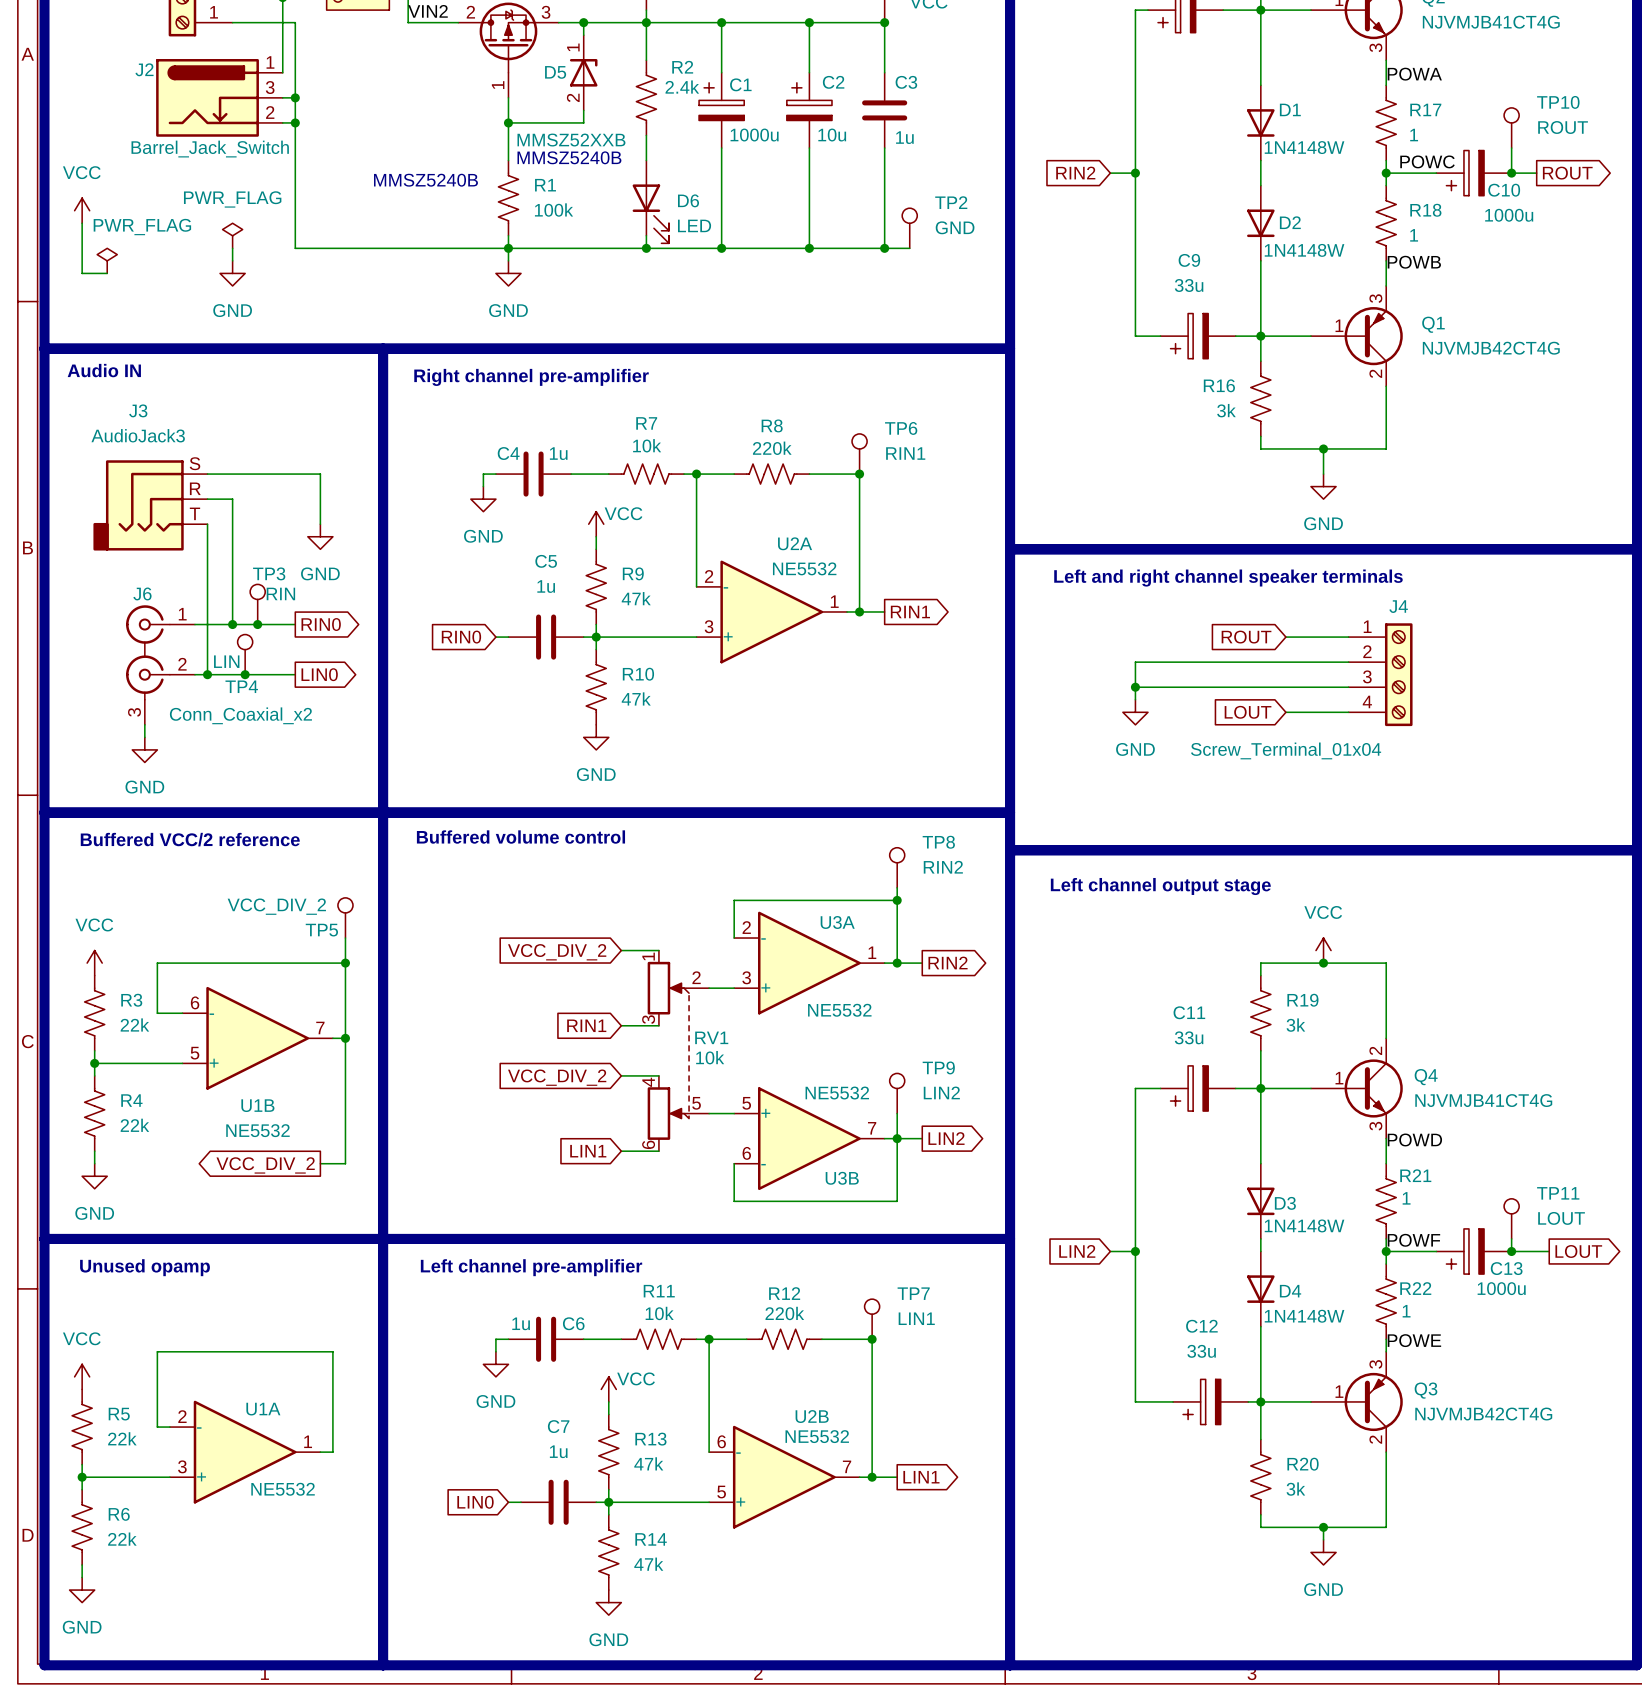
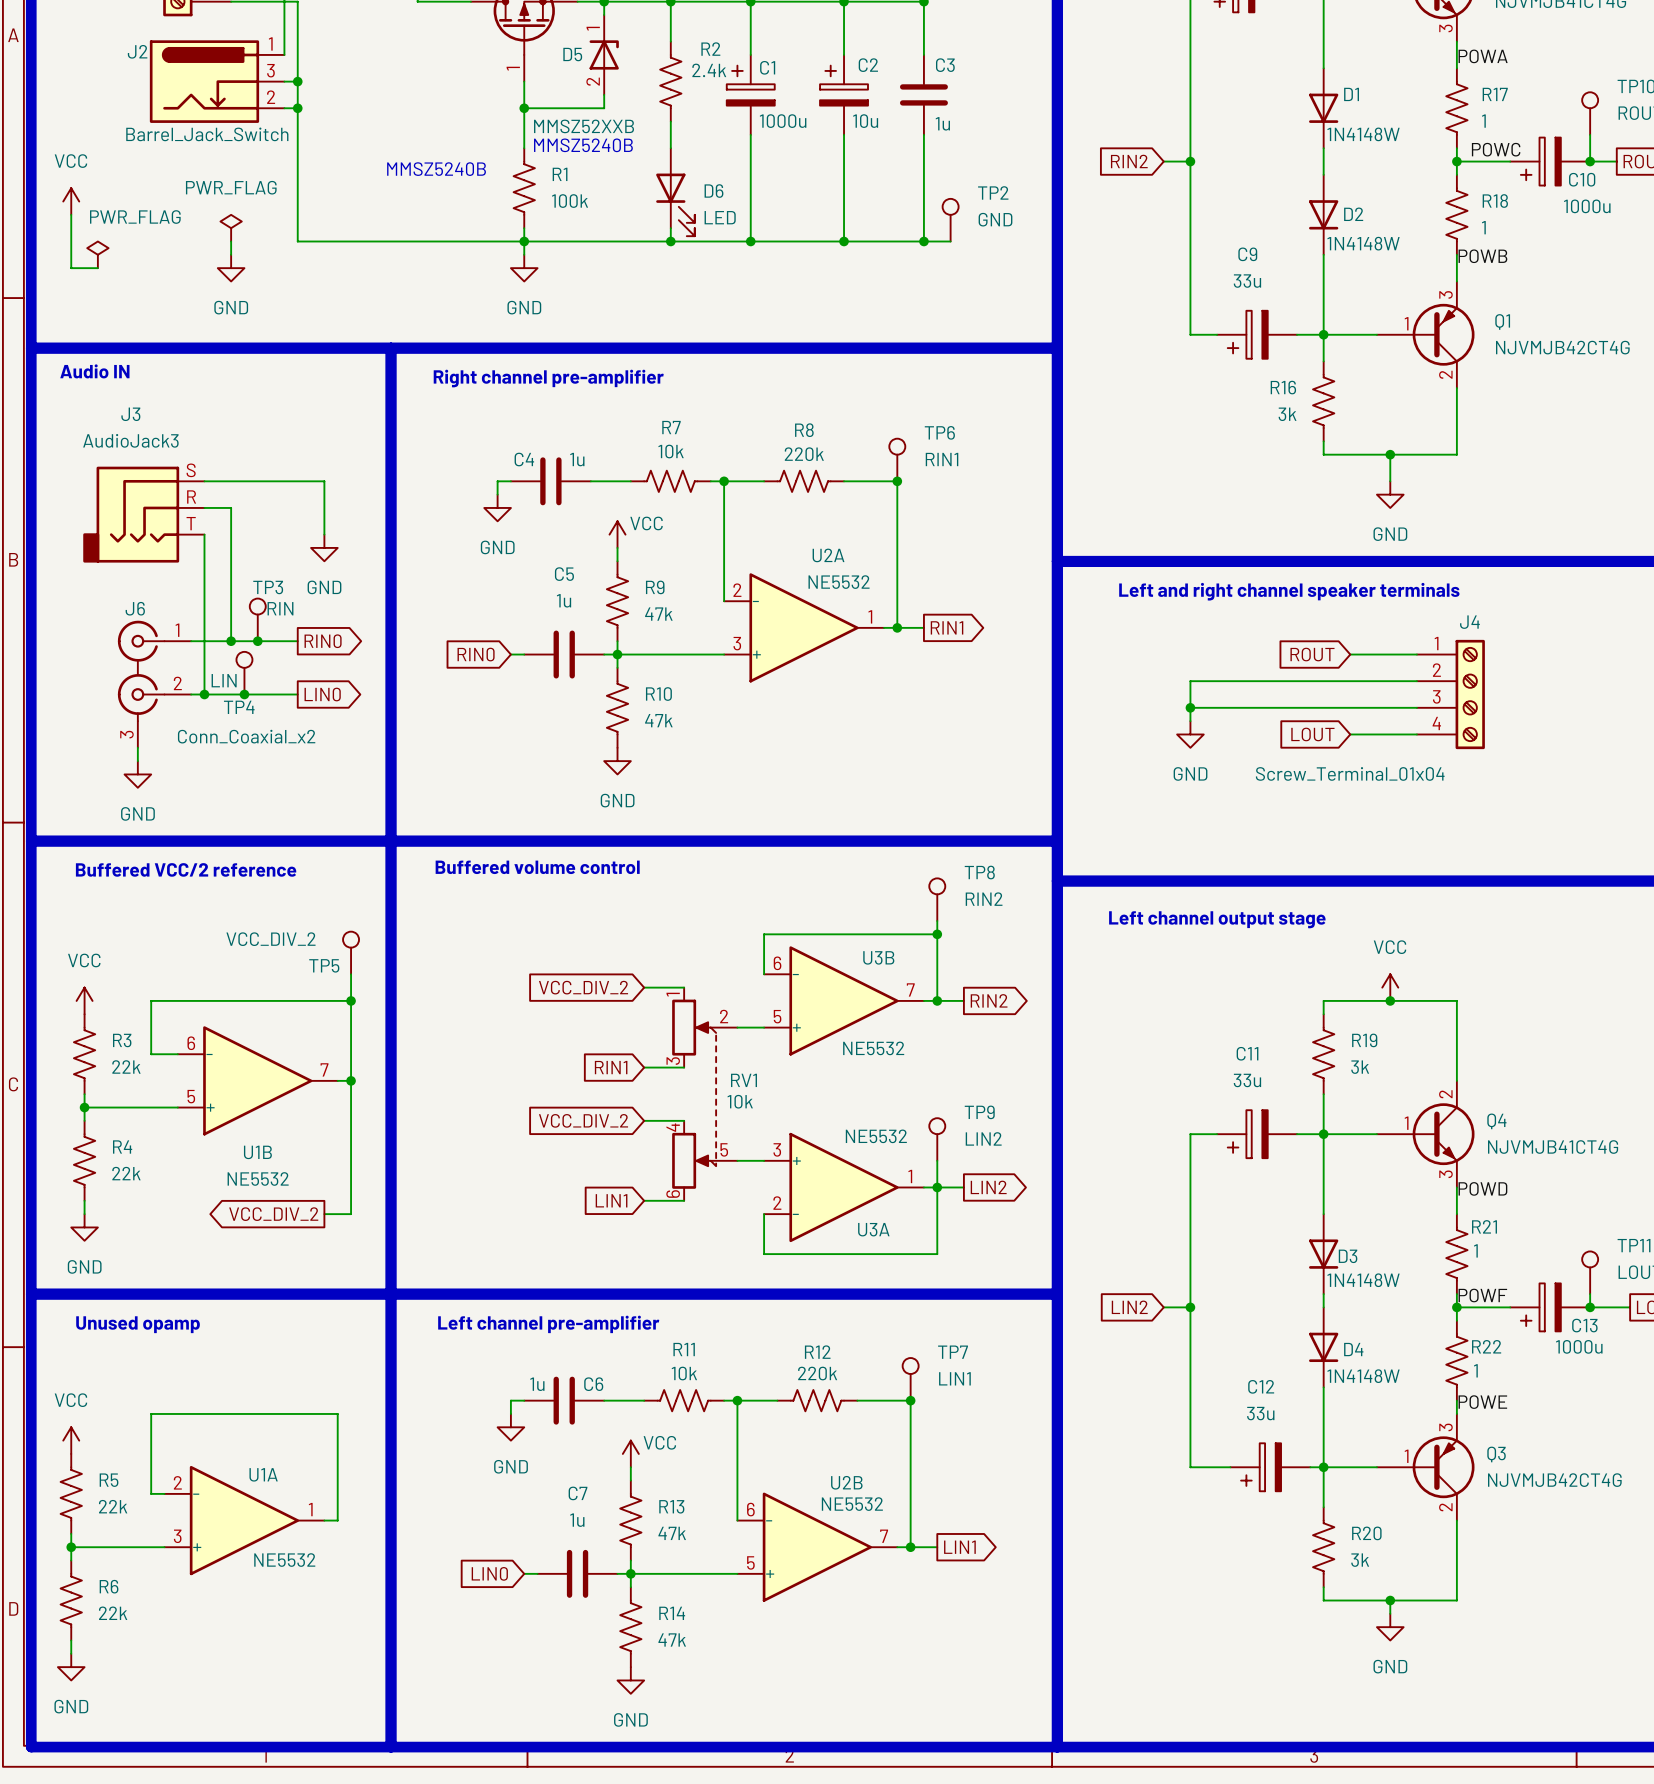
U3A flip: as is (809, 963) -> up-down (844, 1187)
U3A position: (809, 963) -> (844, 1187)
U3B flip: as is (809, 1138) -> up-down (844, 1000)
U3B position: (809, 1138) -> (844, 1000)

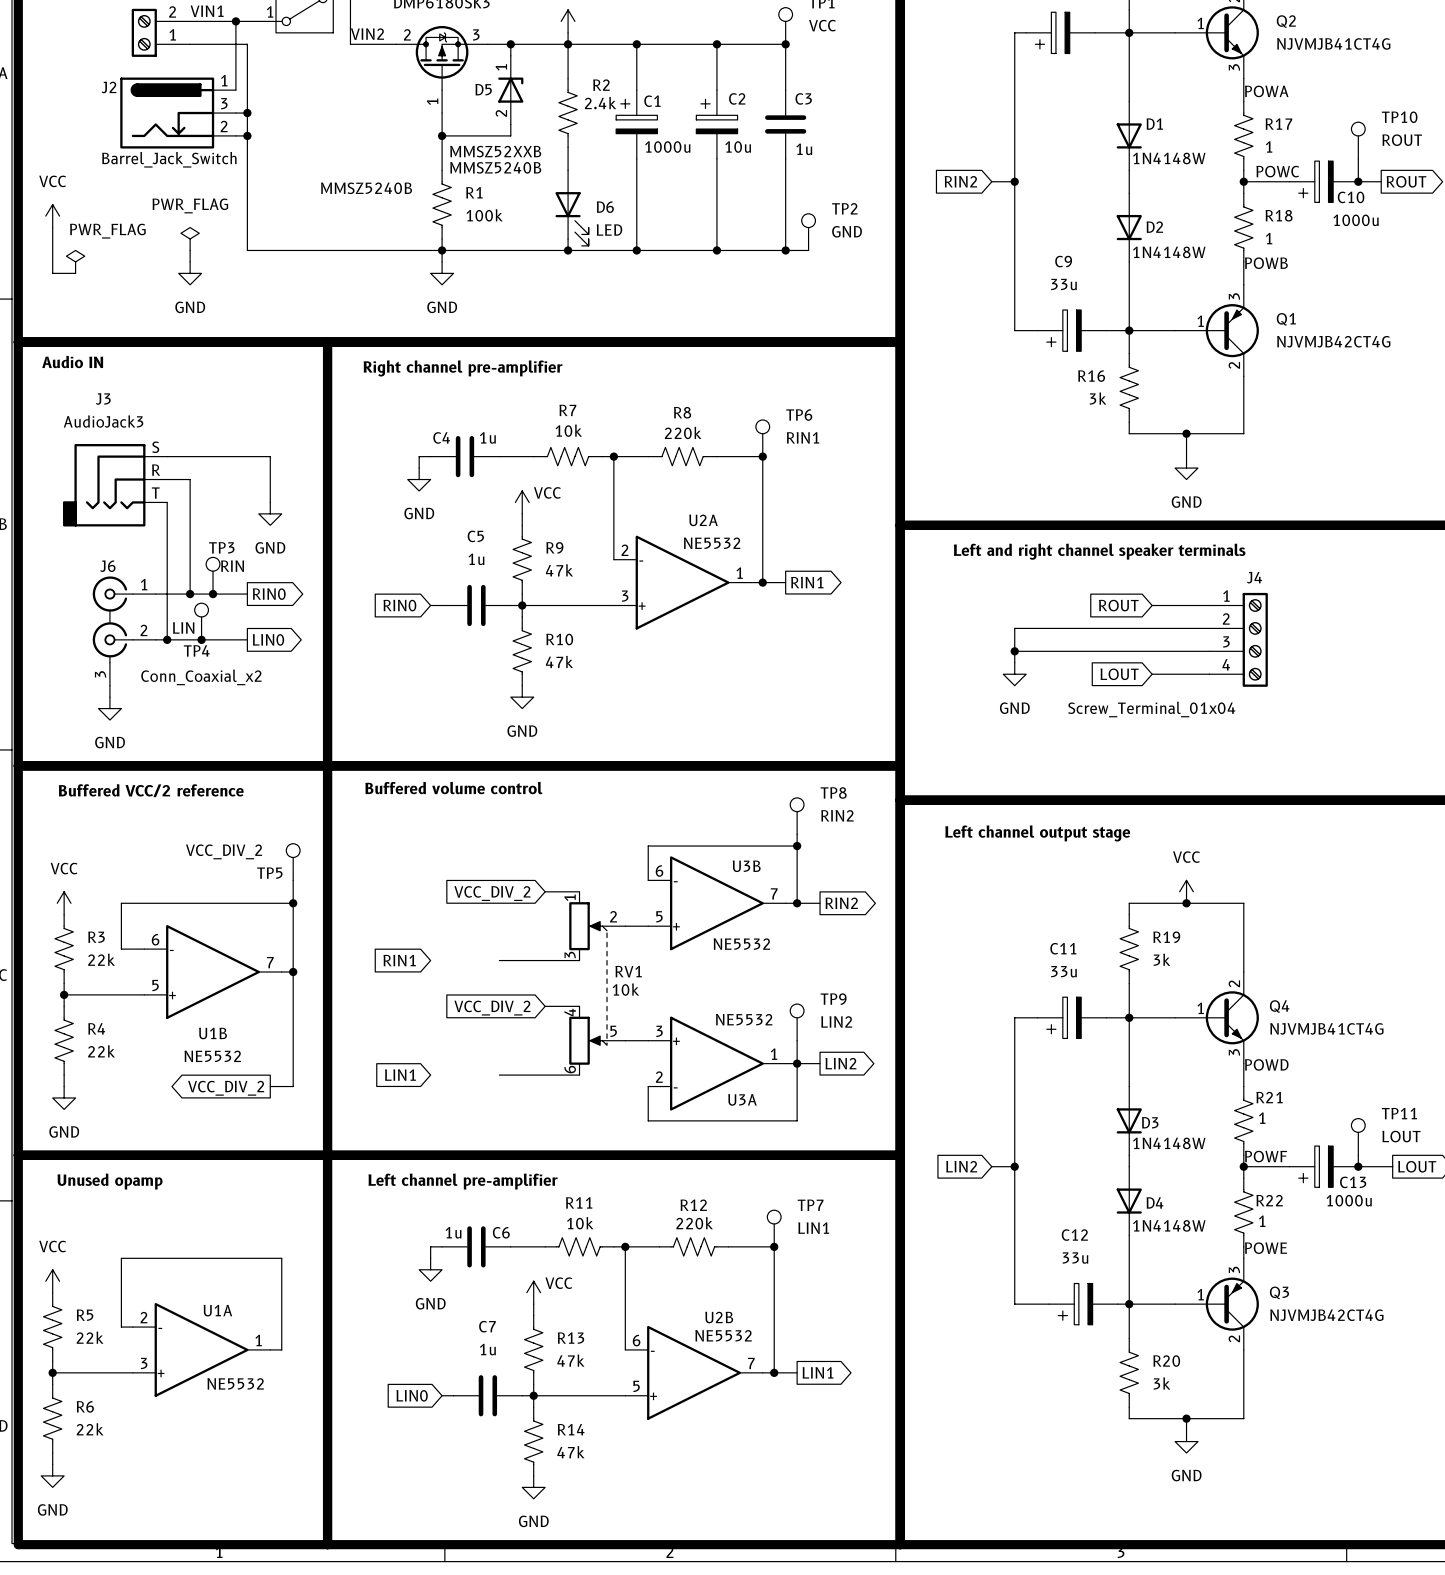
wire: none -> (499, 960) (545, 960)
global label position: RIN1 (611, 1067) -> RIN1 (399, 960)
wire: none -> (499, 1075) (545, 1075)
global label position: LIN1 (611, 1200) -> LIN1 (400, 1075)

